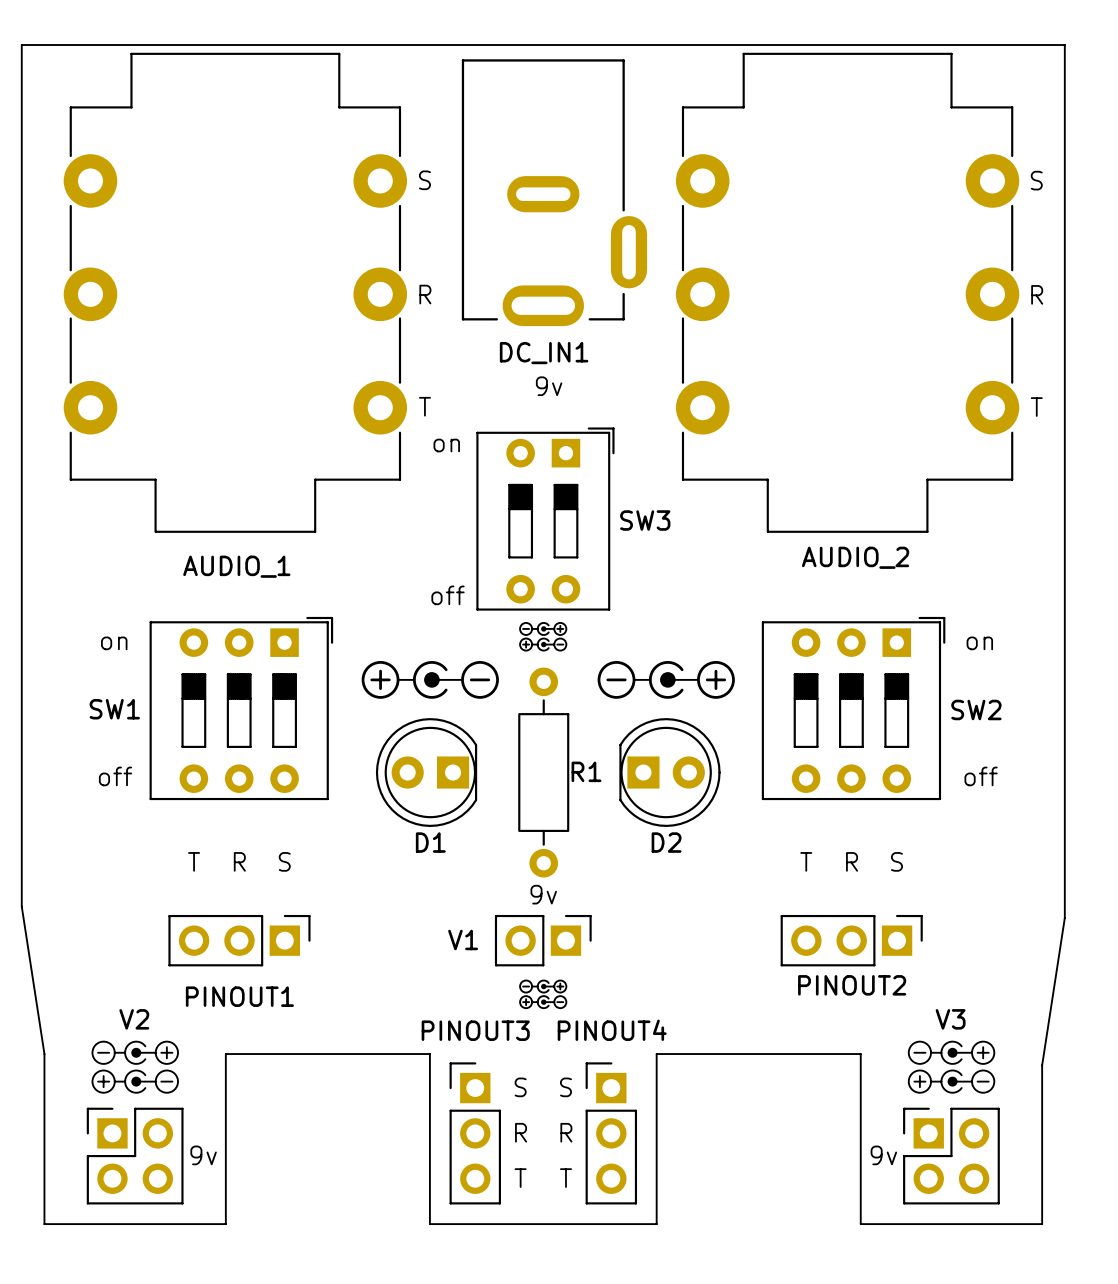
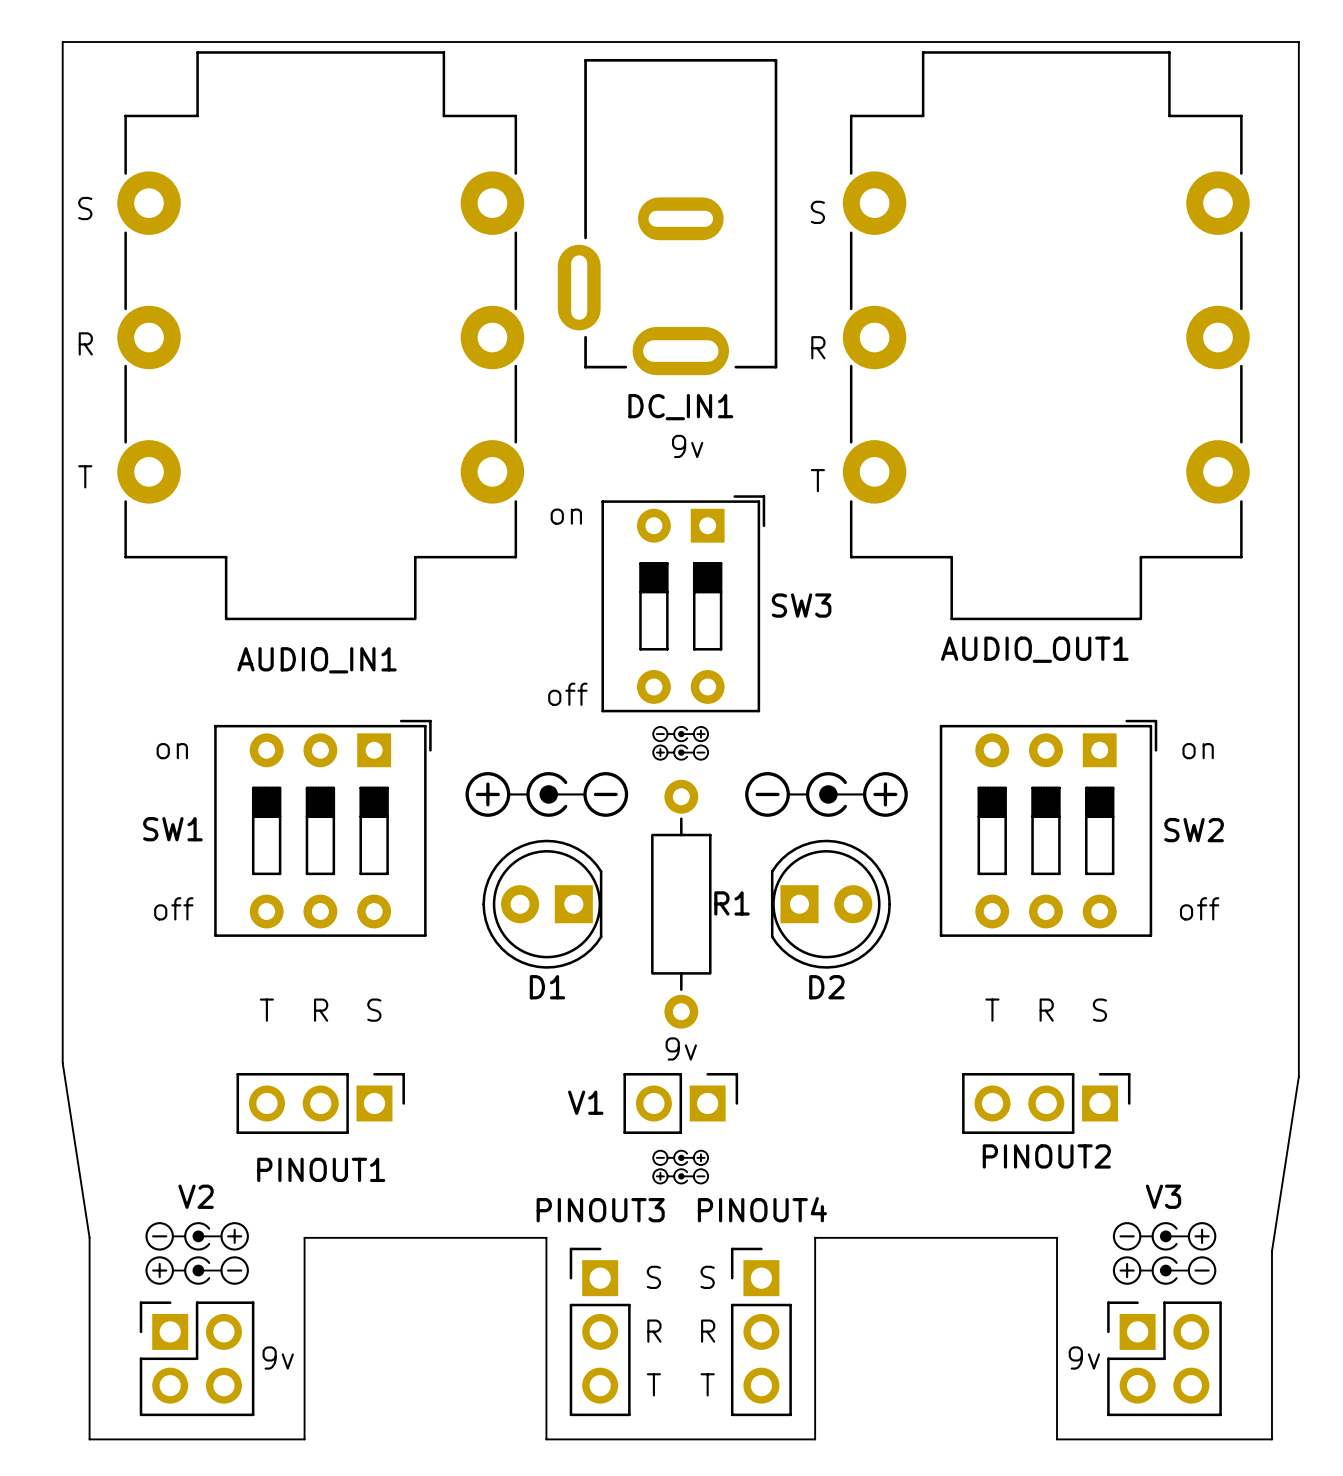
DC_IN1 footprint: [461, 59, 648, 327] -> [557, 58, 778, 376]
text: S (424, 180) -> none
text: S (1036, 180) -> none
text: none -> S (85, 208)
text: none -> S (817, 212)
AUDIO_1: (235, 292) -> none
AUDIO_IN1: none -> (320, 335)
AUDIO_2: (847, 292) -> none
AUDIO_OUT1: none -> (1046, 335)
text: R (425, 294) -> none
text: R (1037, 294) -> none
text: none -> R (85, 343)
text: none -> R (818, 347)
text: T (424, 406) -> none
text: T (1036, 407) -> none
text: none -> T (85, 476)
text: none -> T (817, 480)

